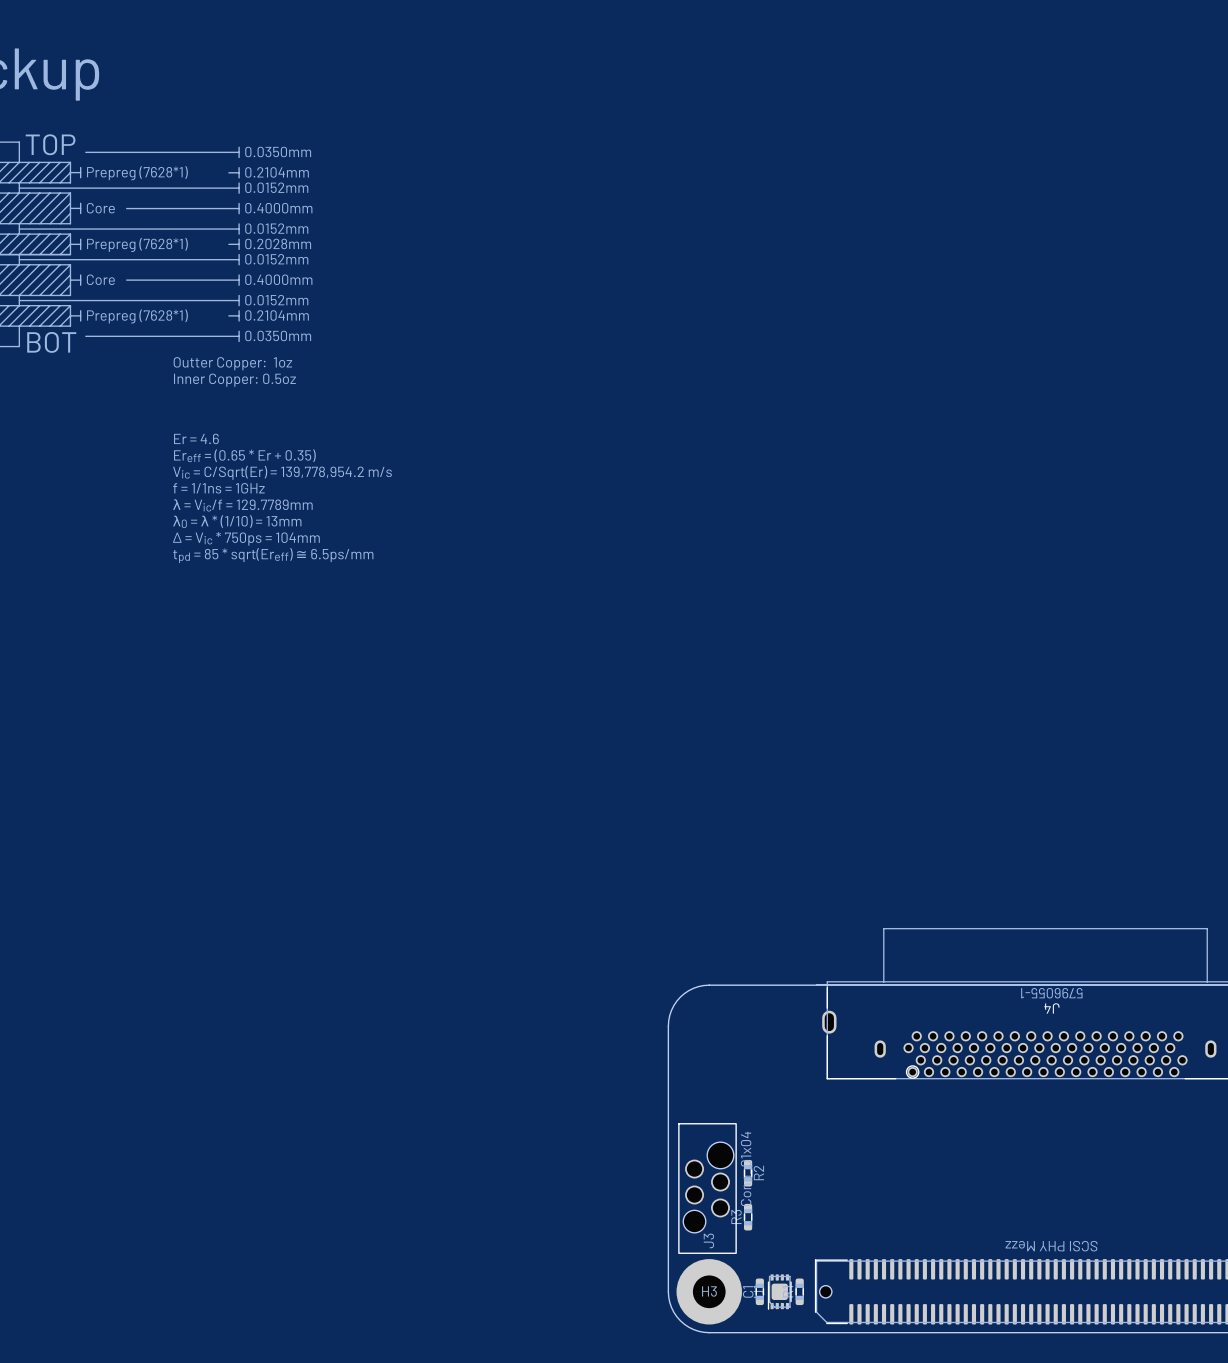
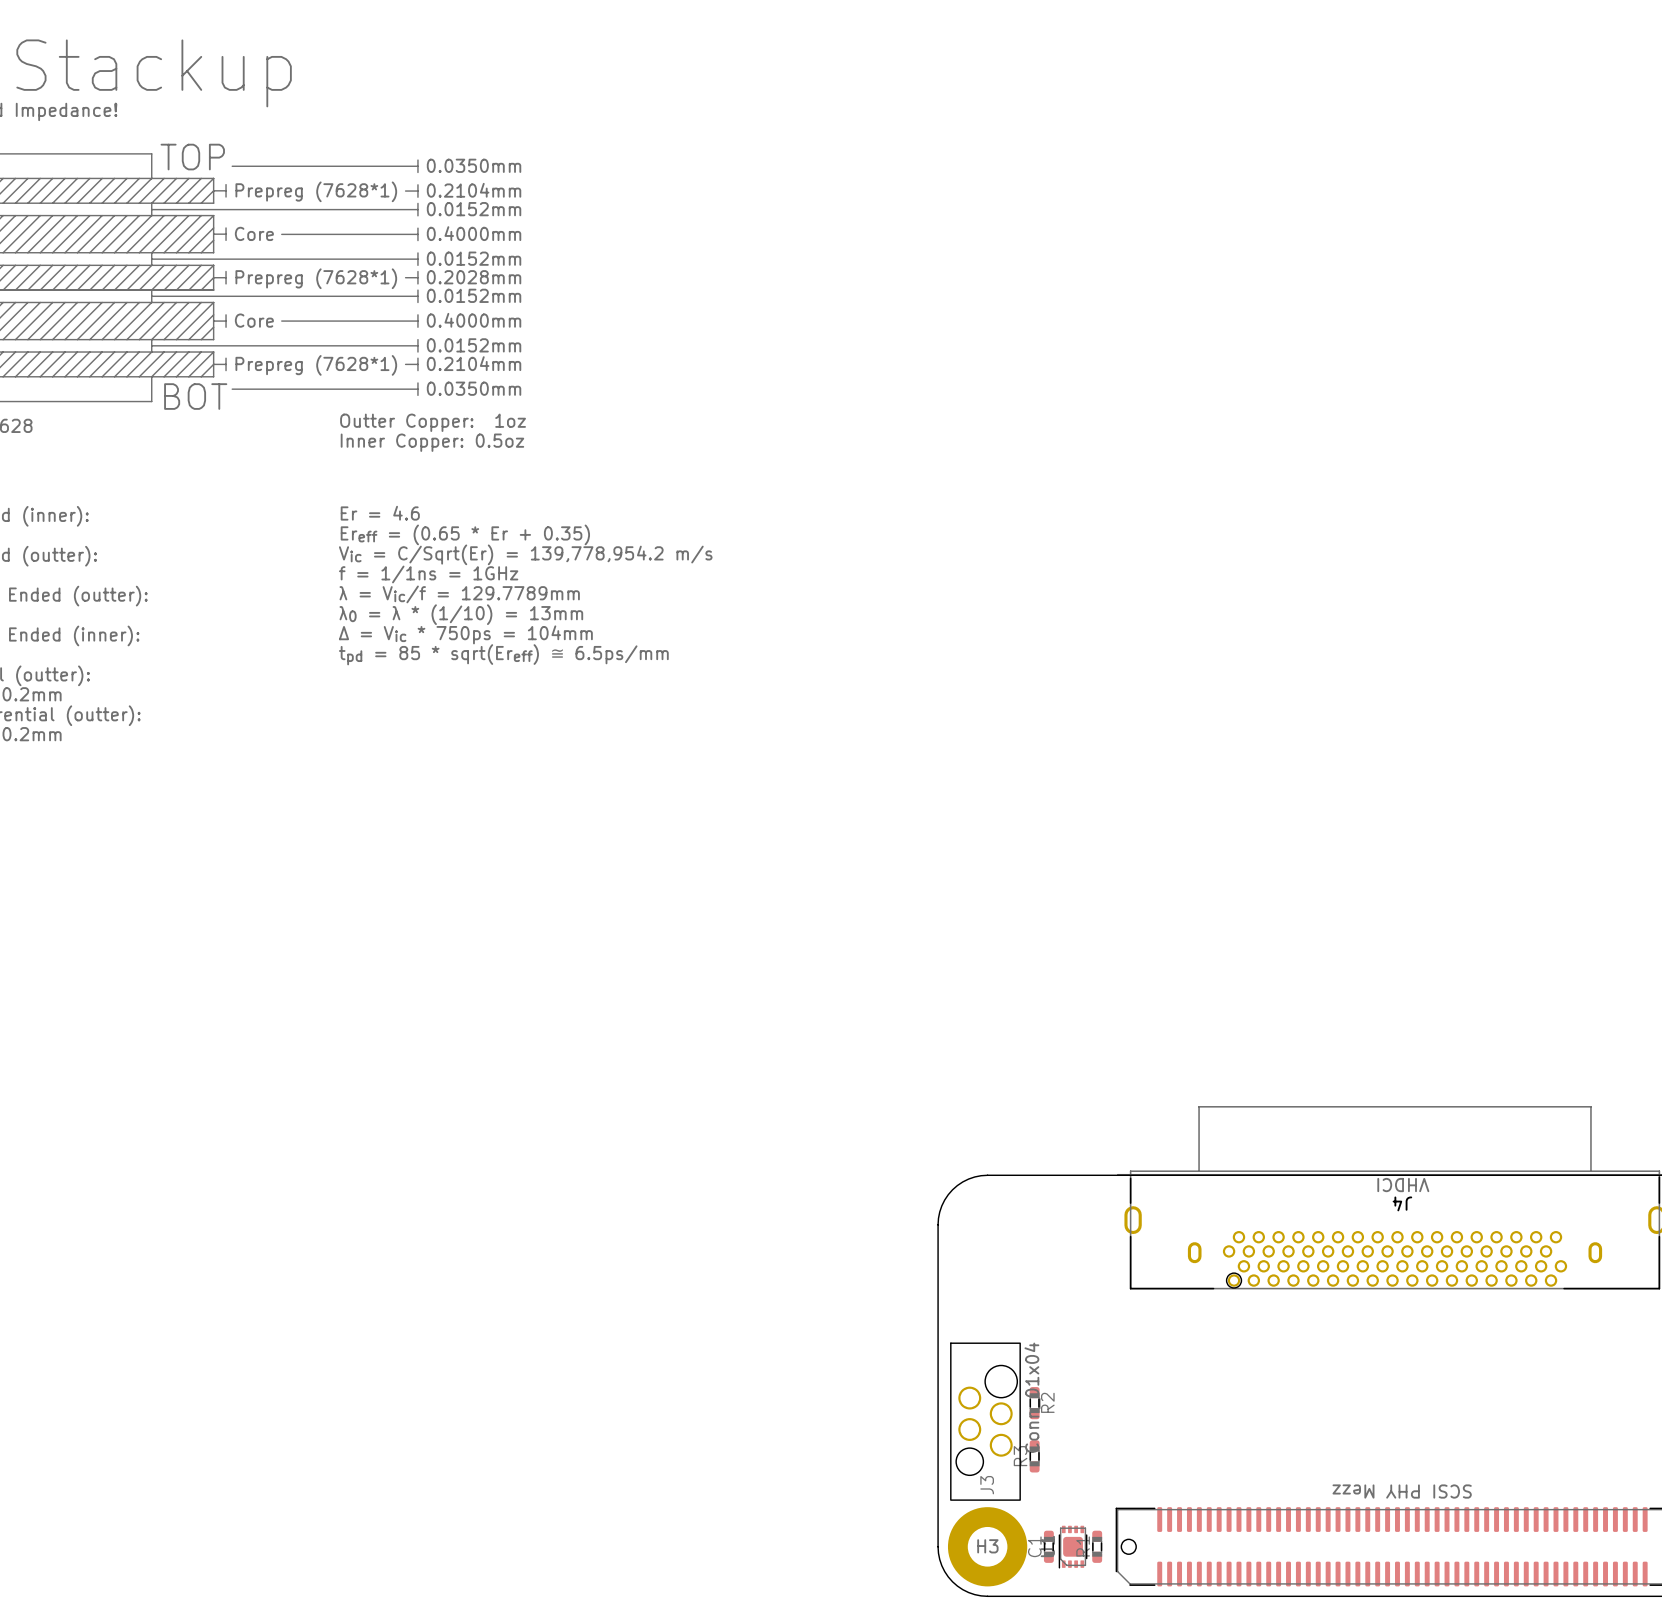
J4 value: 5796055-1 (1051, 993) -> VHDCI (1403, 1185)

